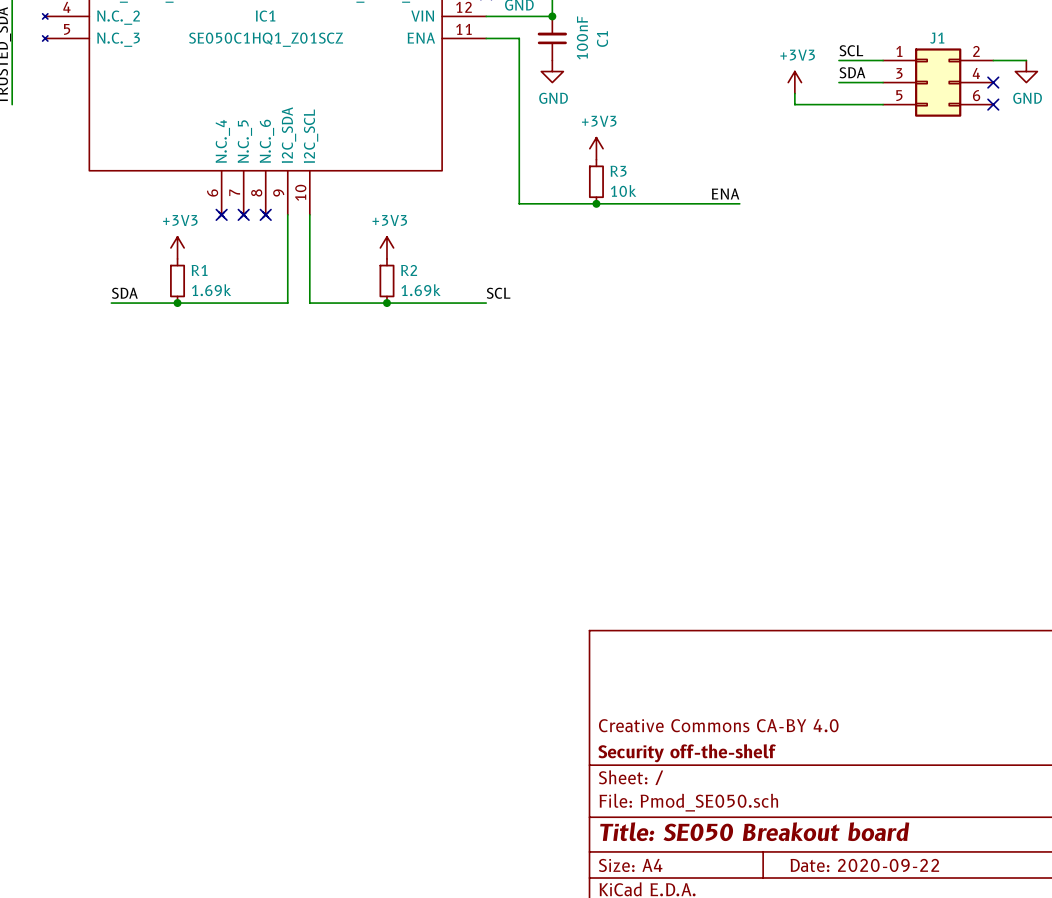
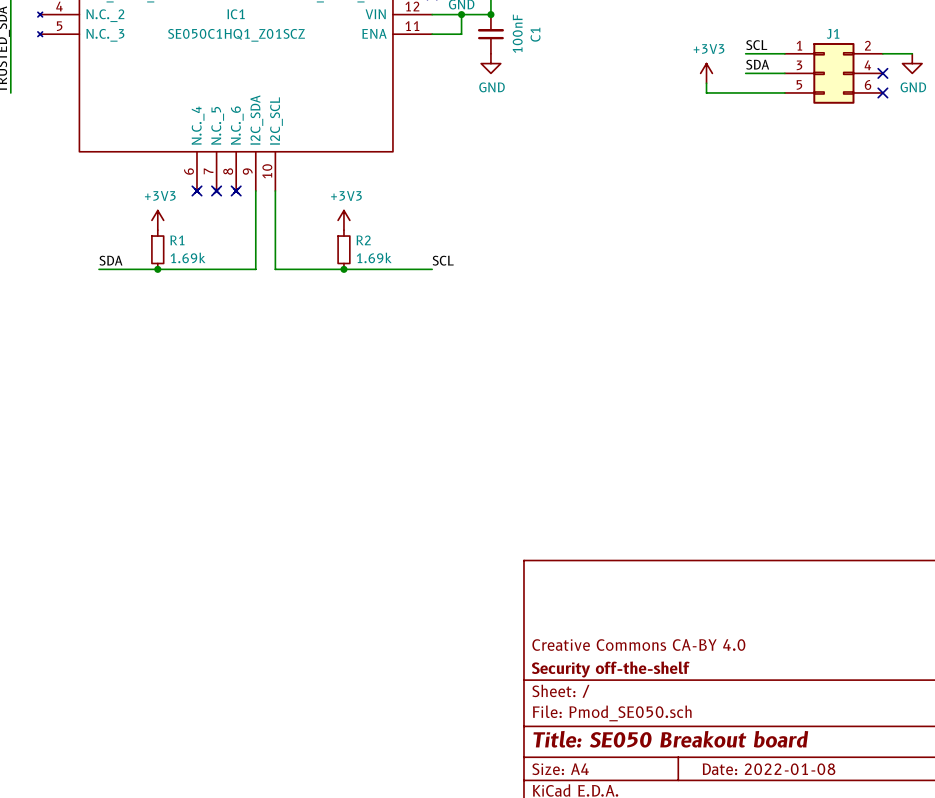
junction: none -> (461, 14)
wire: (519, 38) (519, 203) (739, 203) -> (461, 34) (461, 14)
power symbol: +3V3 (596, 148) -> none
R3: 10k (596, 181) -> none
label: ENA (725, 193) -> none
junction: (596, 203) -> none
title block: Date: 2020-09-22 (864, 865) -> Date: 2022-01-08 (769, 769)

